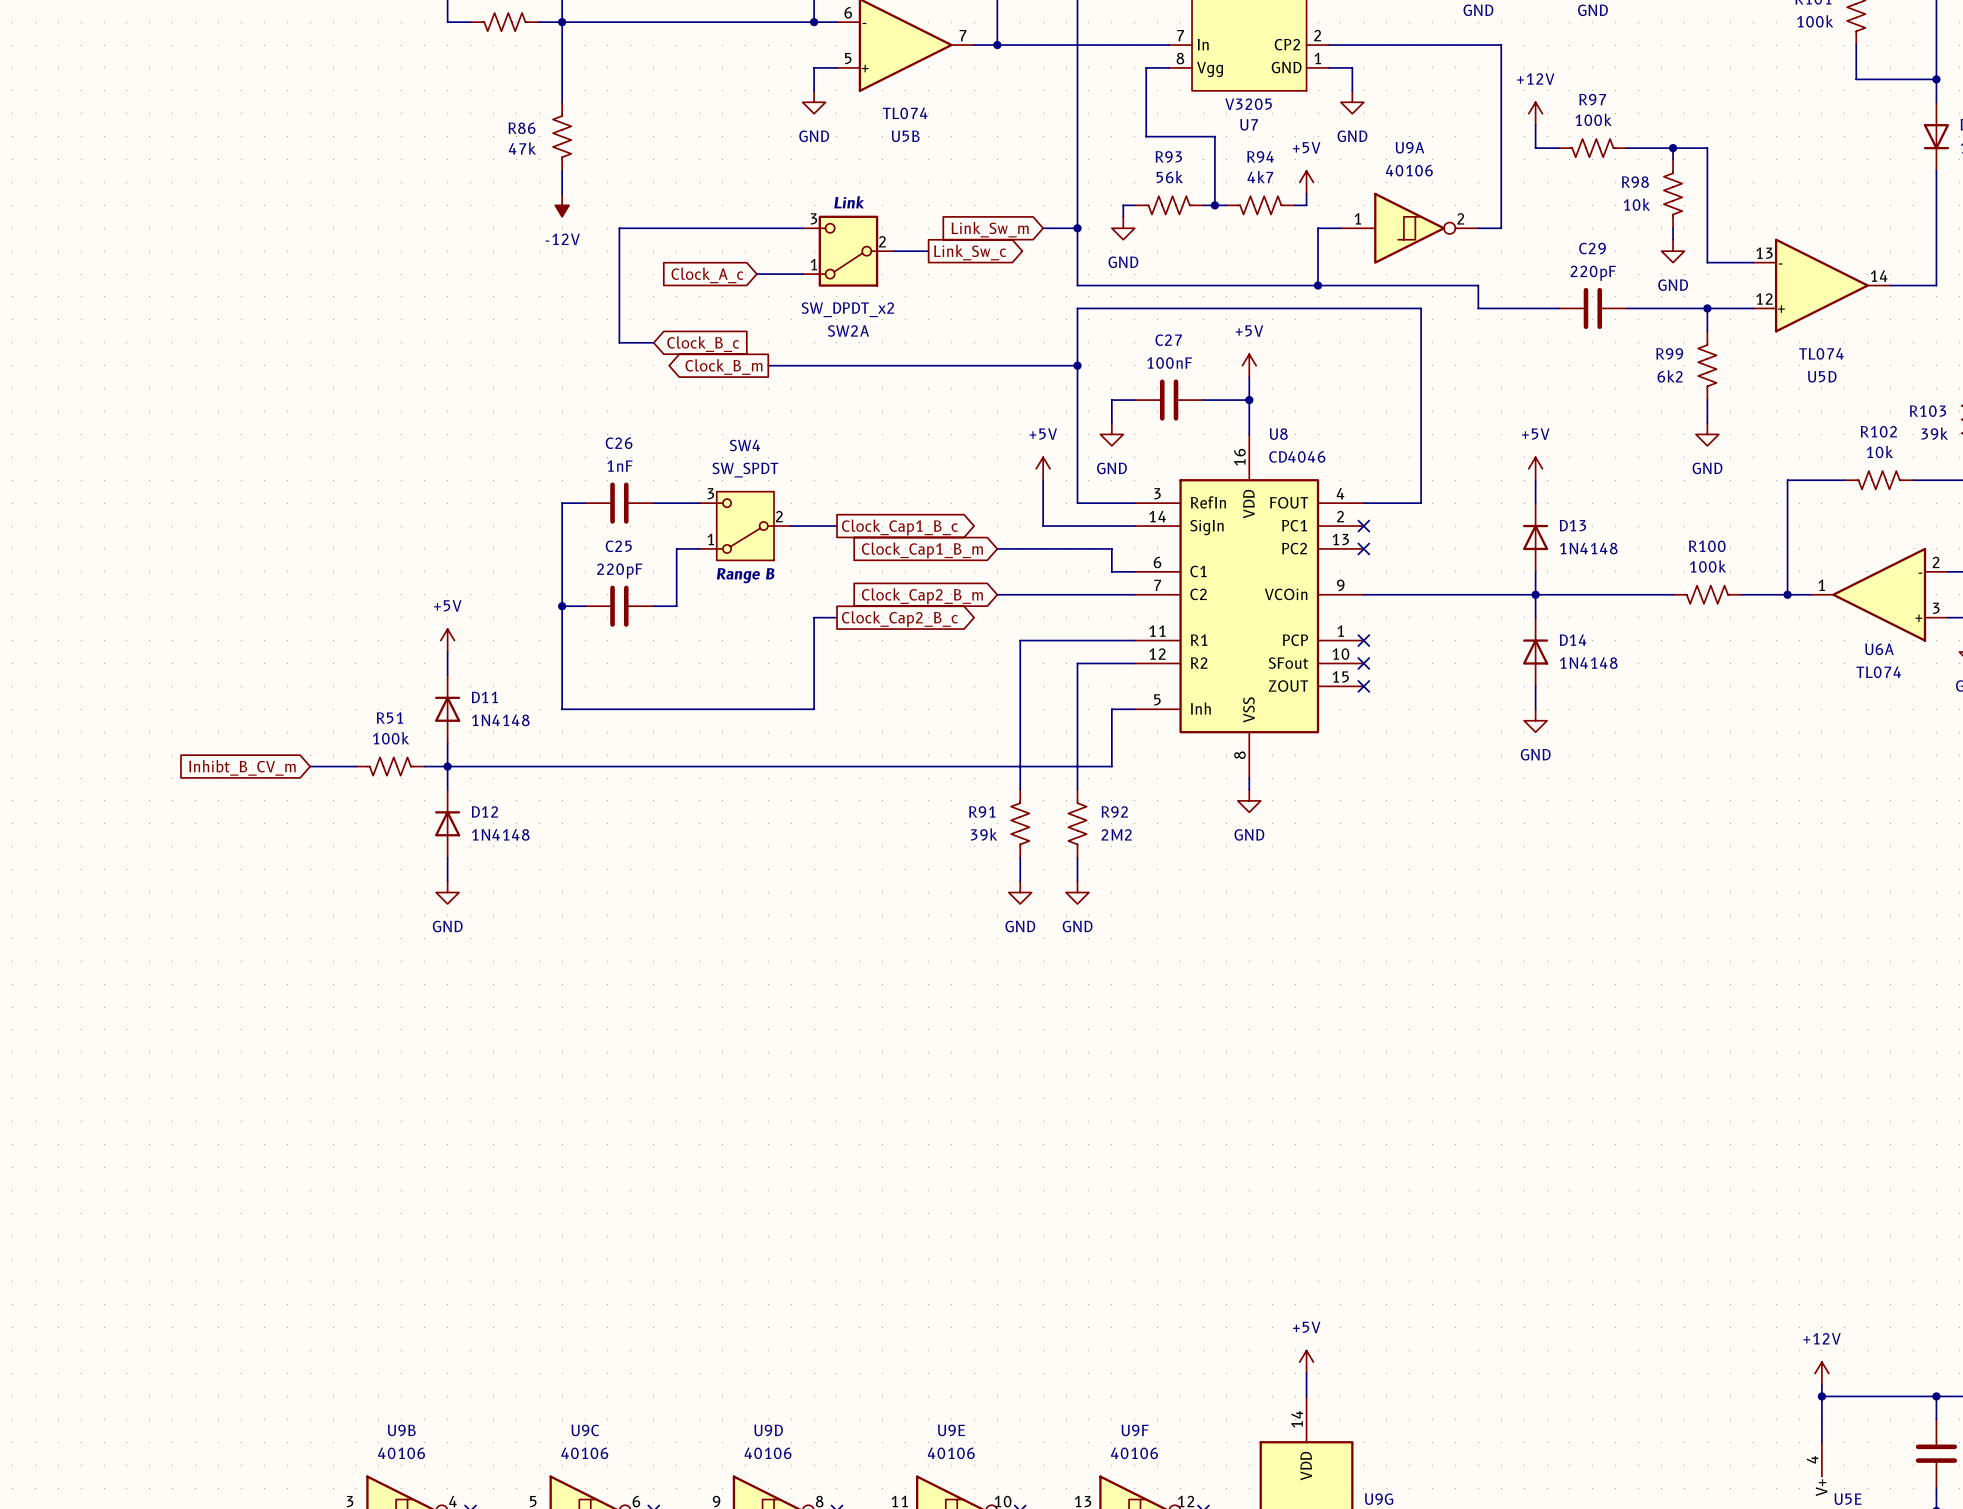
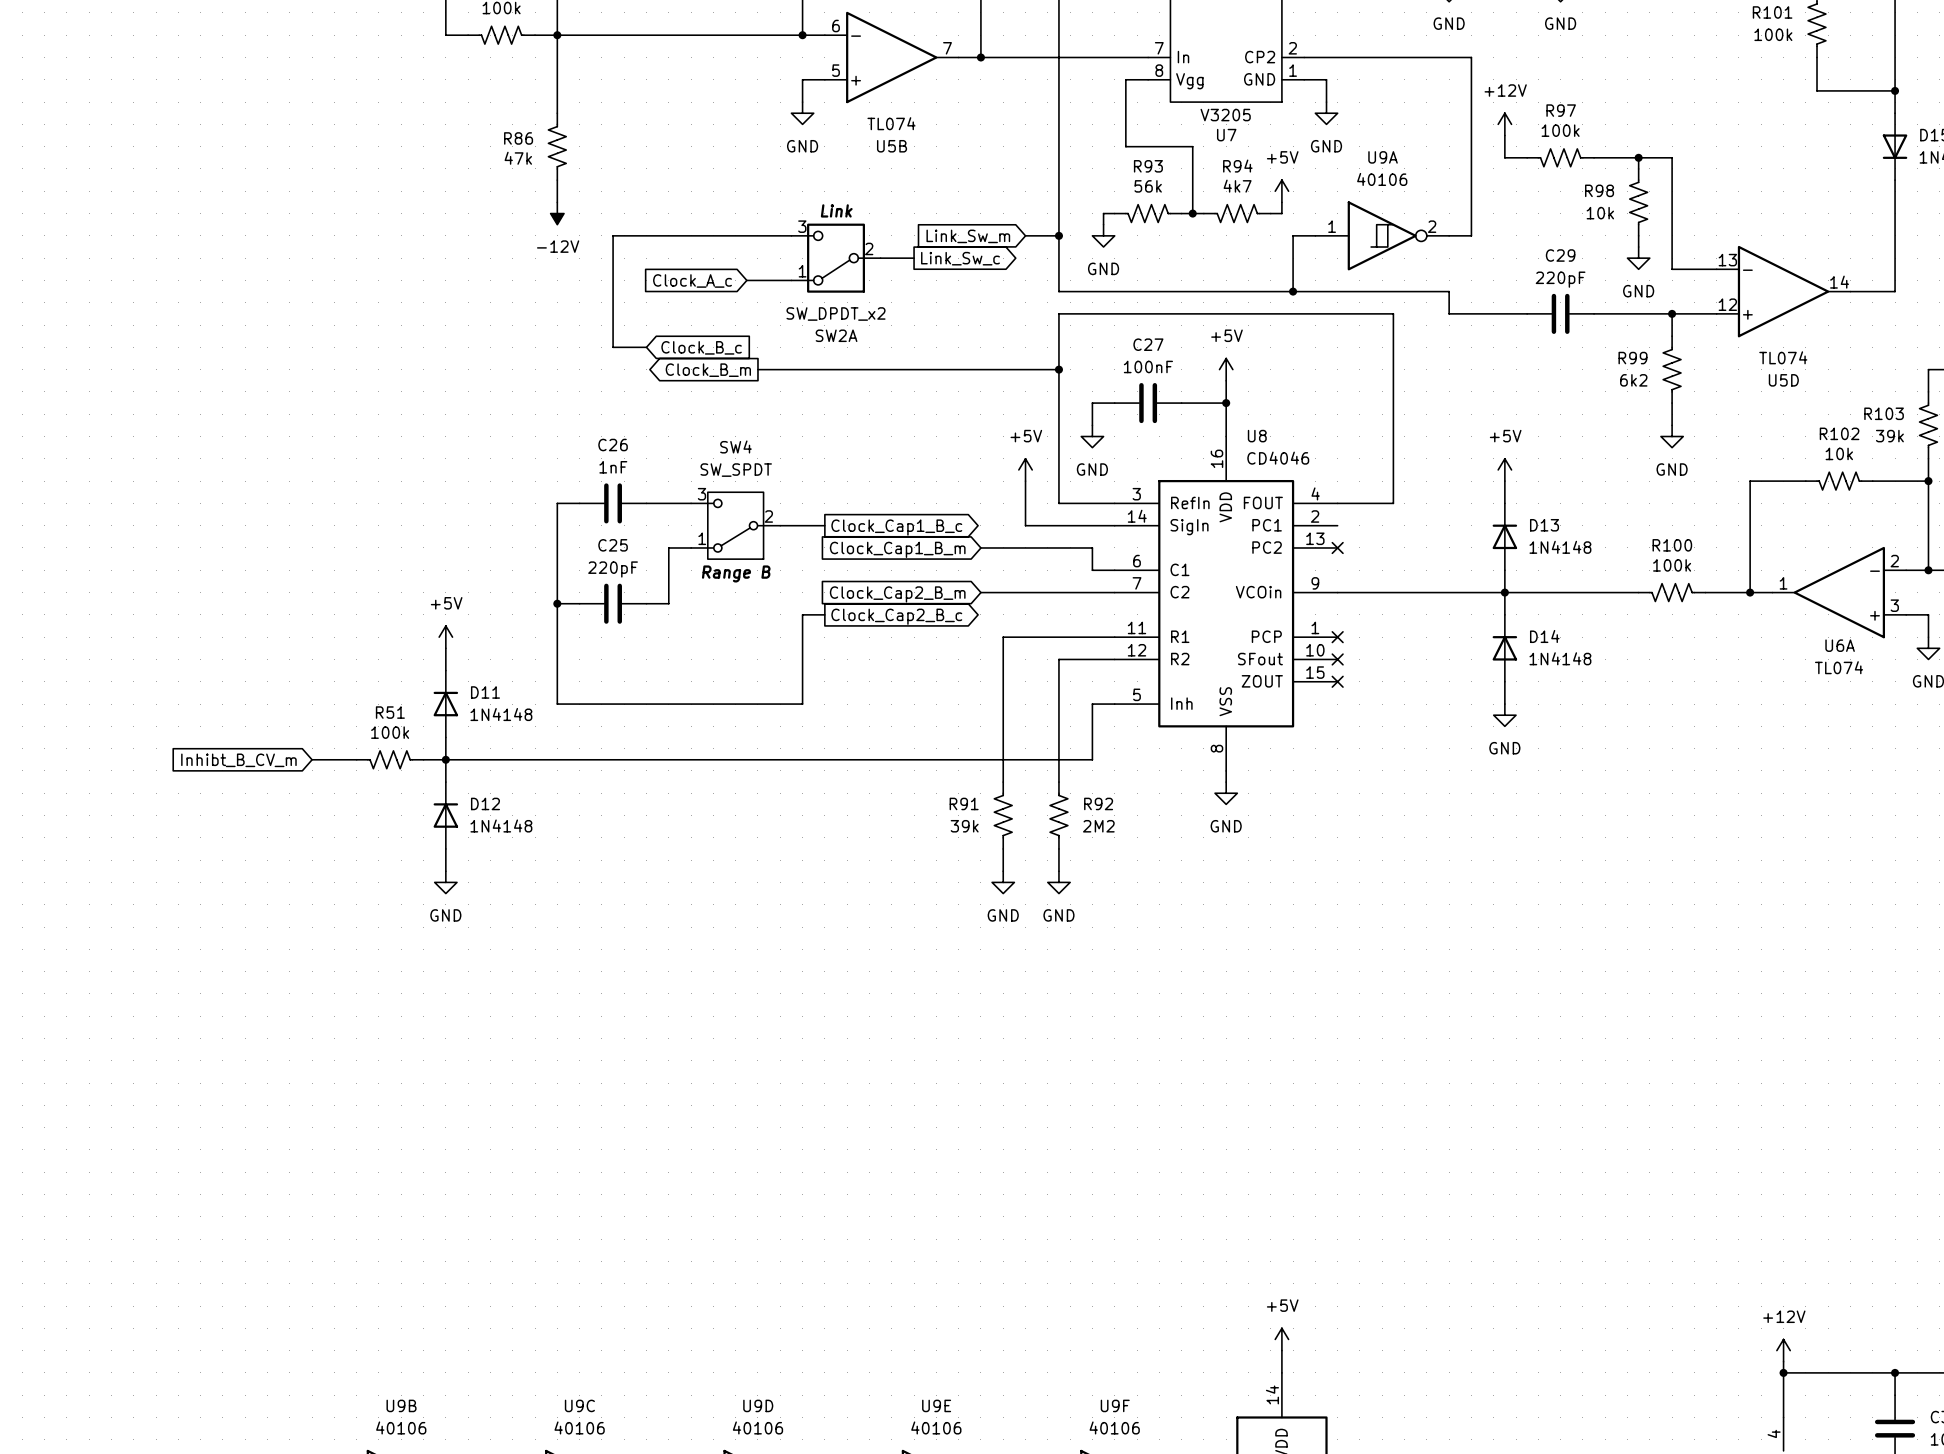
no-connect mark: (1363, 526) -> none

